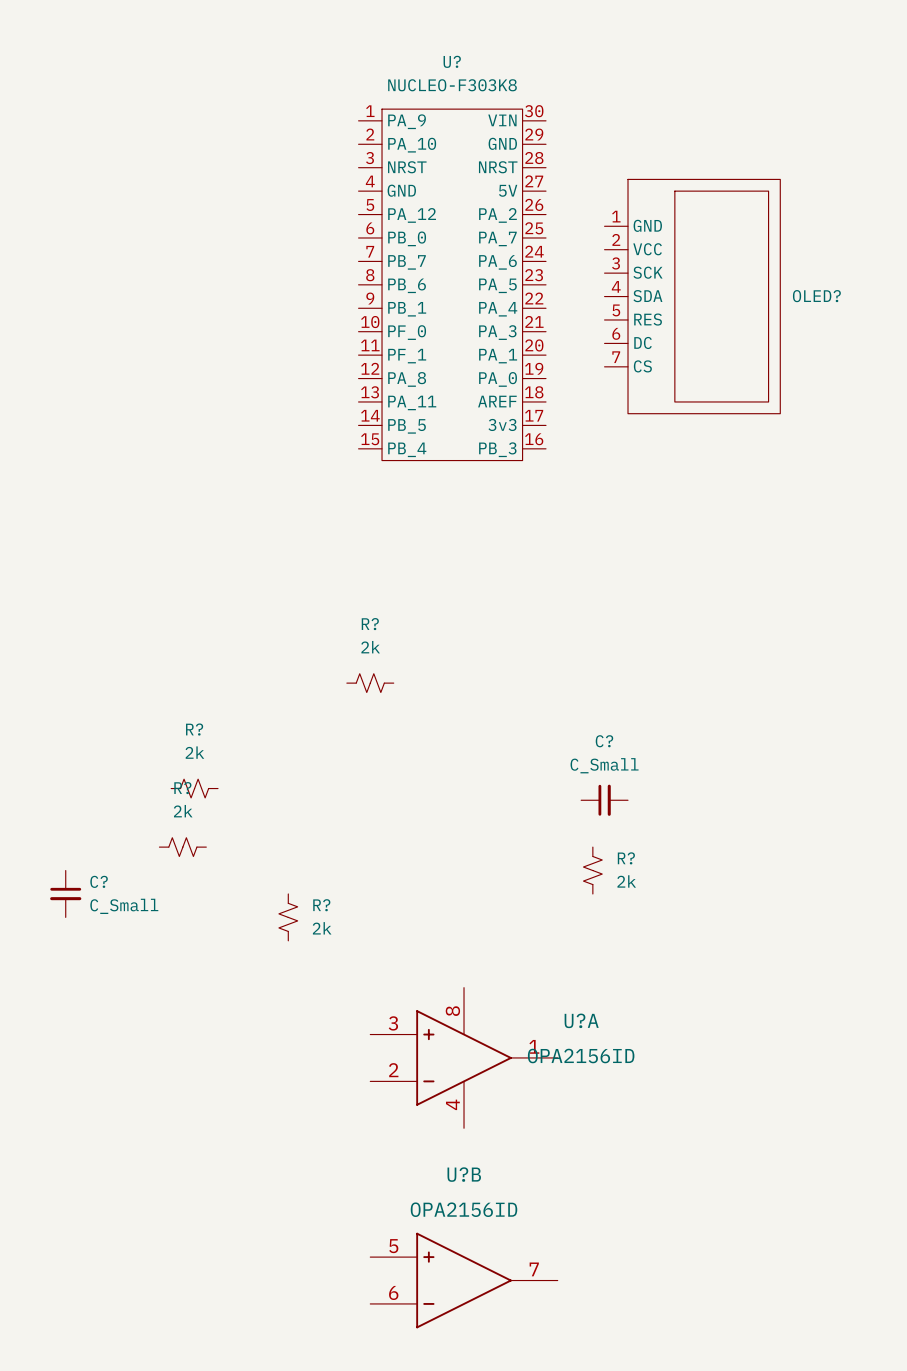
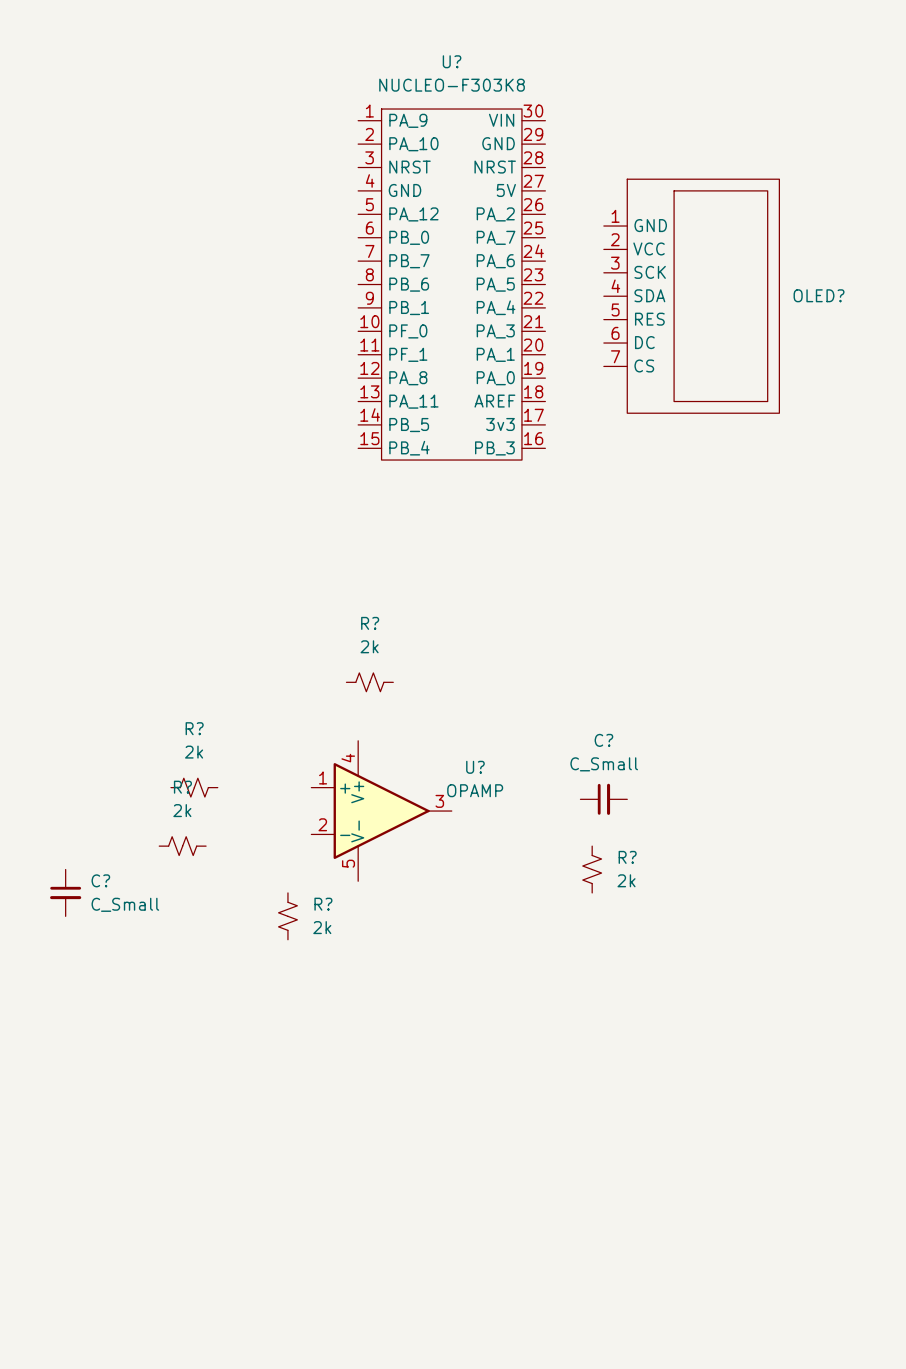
U?: none -> OPAMP (381, 811)
U?A: OPA2156ID (464, 1057) -> none
U?B: OPA2156ID (464, 1280) -> none

